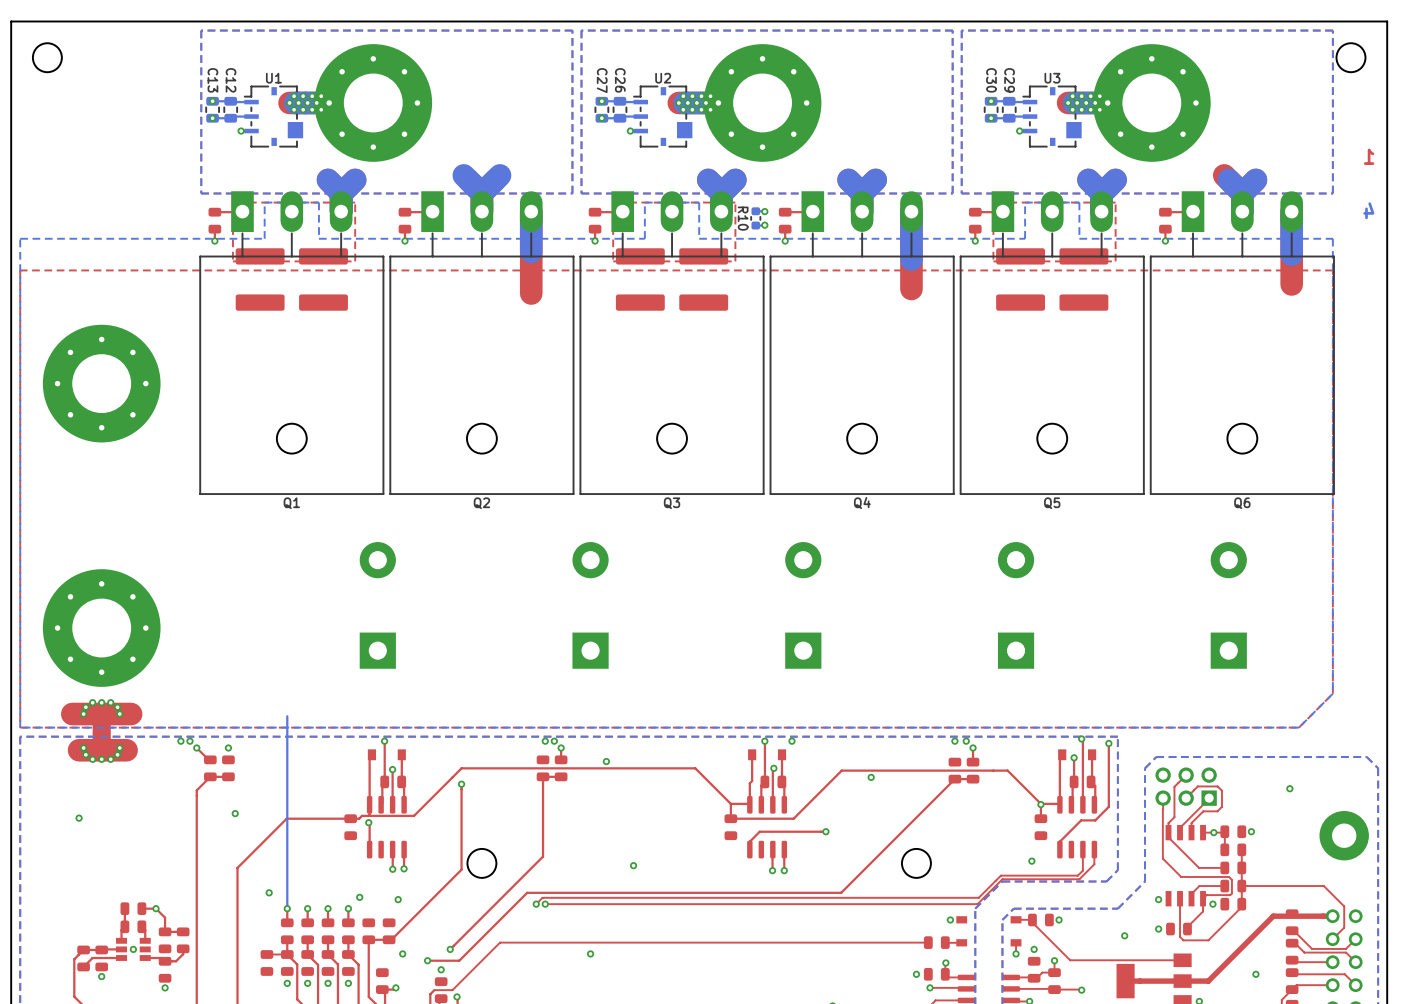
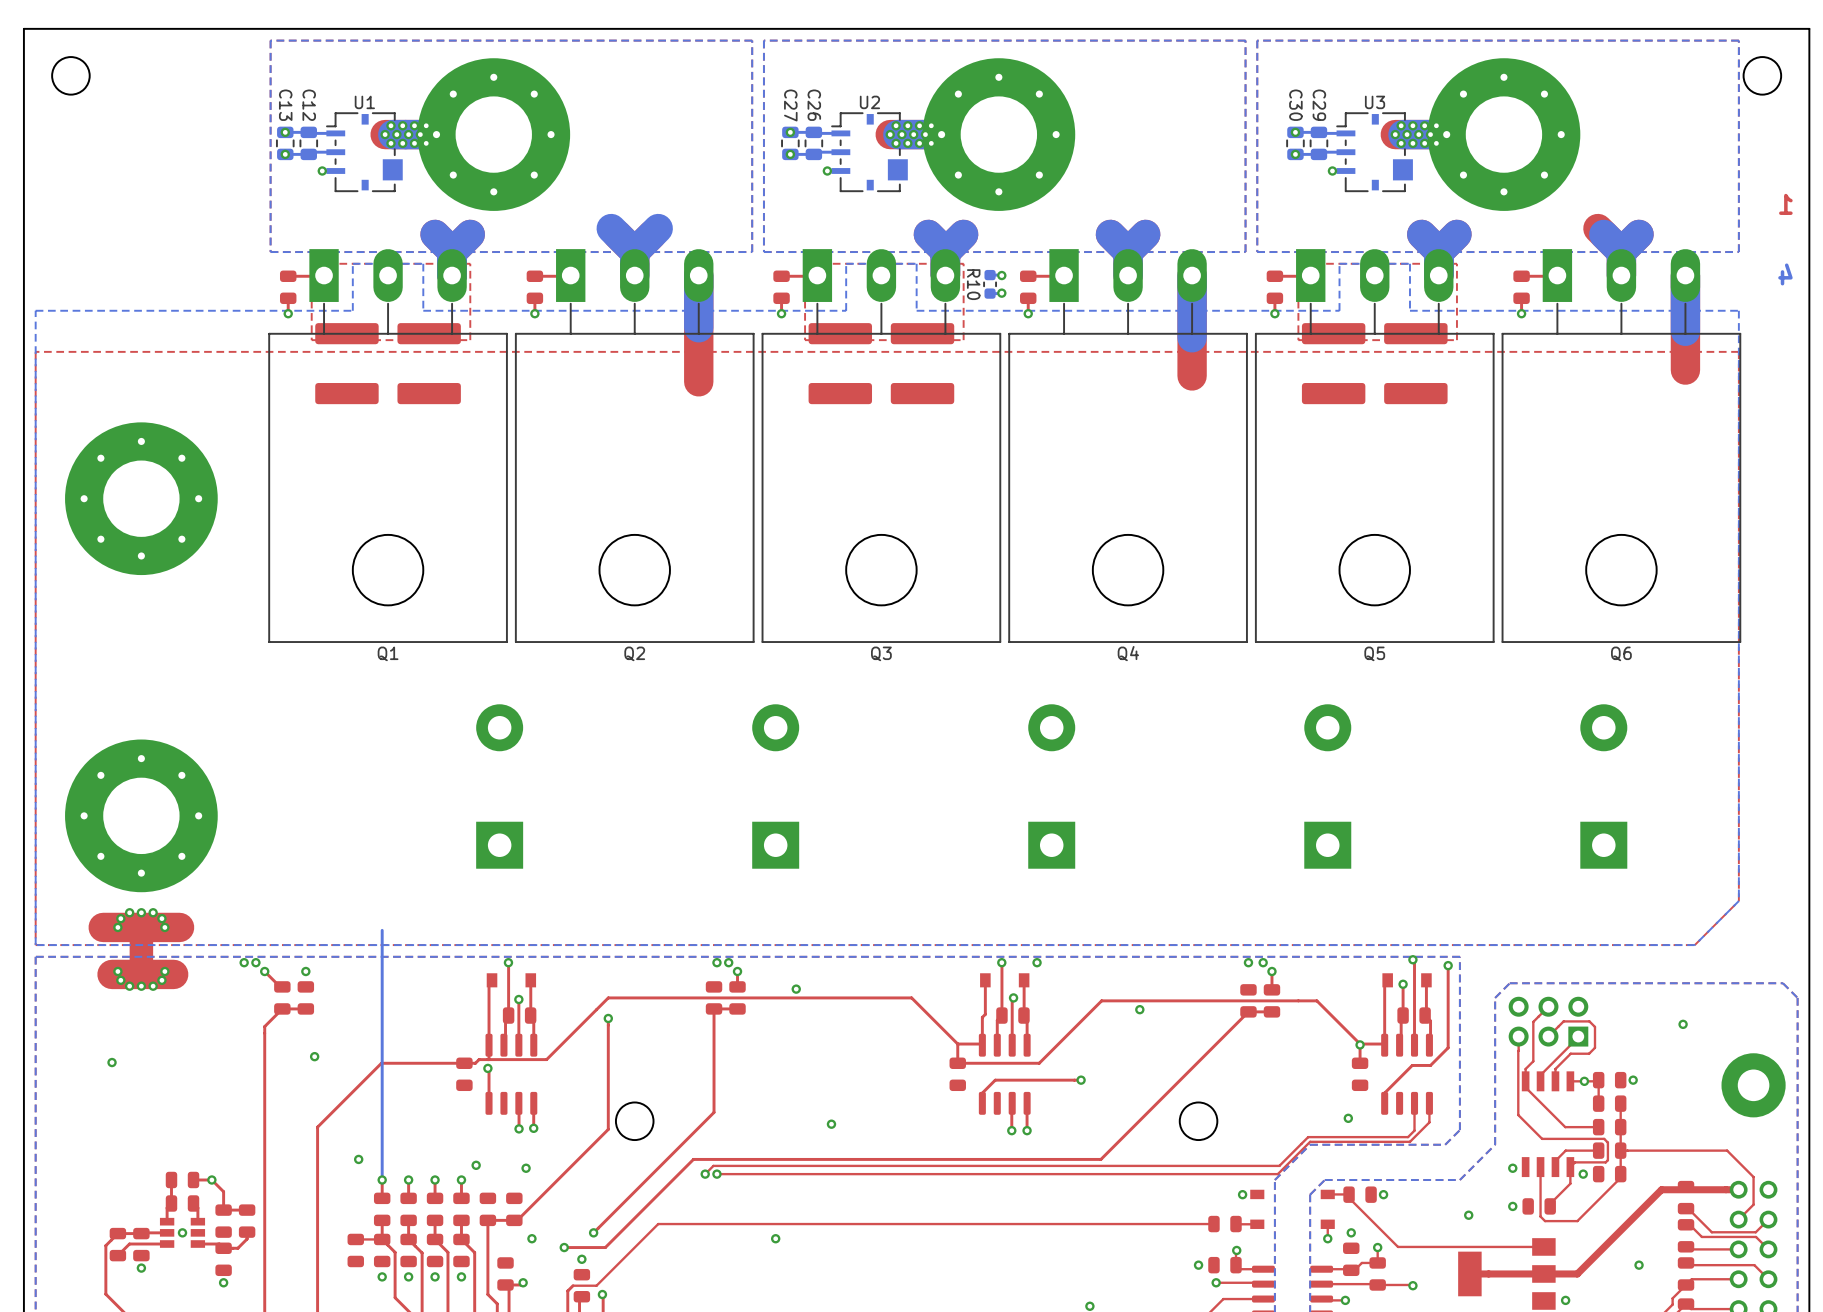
Q1 footprint: [199, 191, 384, 495] -> [268, 249, 508, 643]
Q2 footprint: [389, 191, 575, 495] -> [515, 249, 755, 643]
Q3 footprint: [579, 191, 765, 495] -> [761, 249, 1001, 643]
Q4 footprint: [769, 191, 955, 495] -> [1008, 249, 1248, 643]
Q5 footprint: [960, 191, 1145, 495] -> [1255, 249, 1495, 643]
Q6 footprint: [1150, 191, 1335, 495] -> [1501, 249, 1741, 643]

